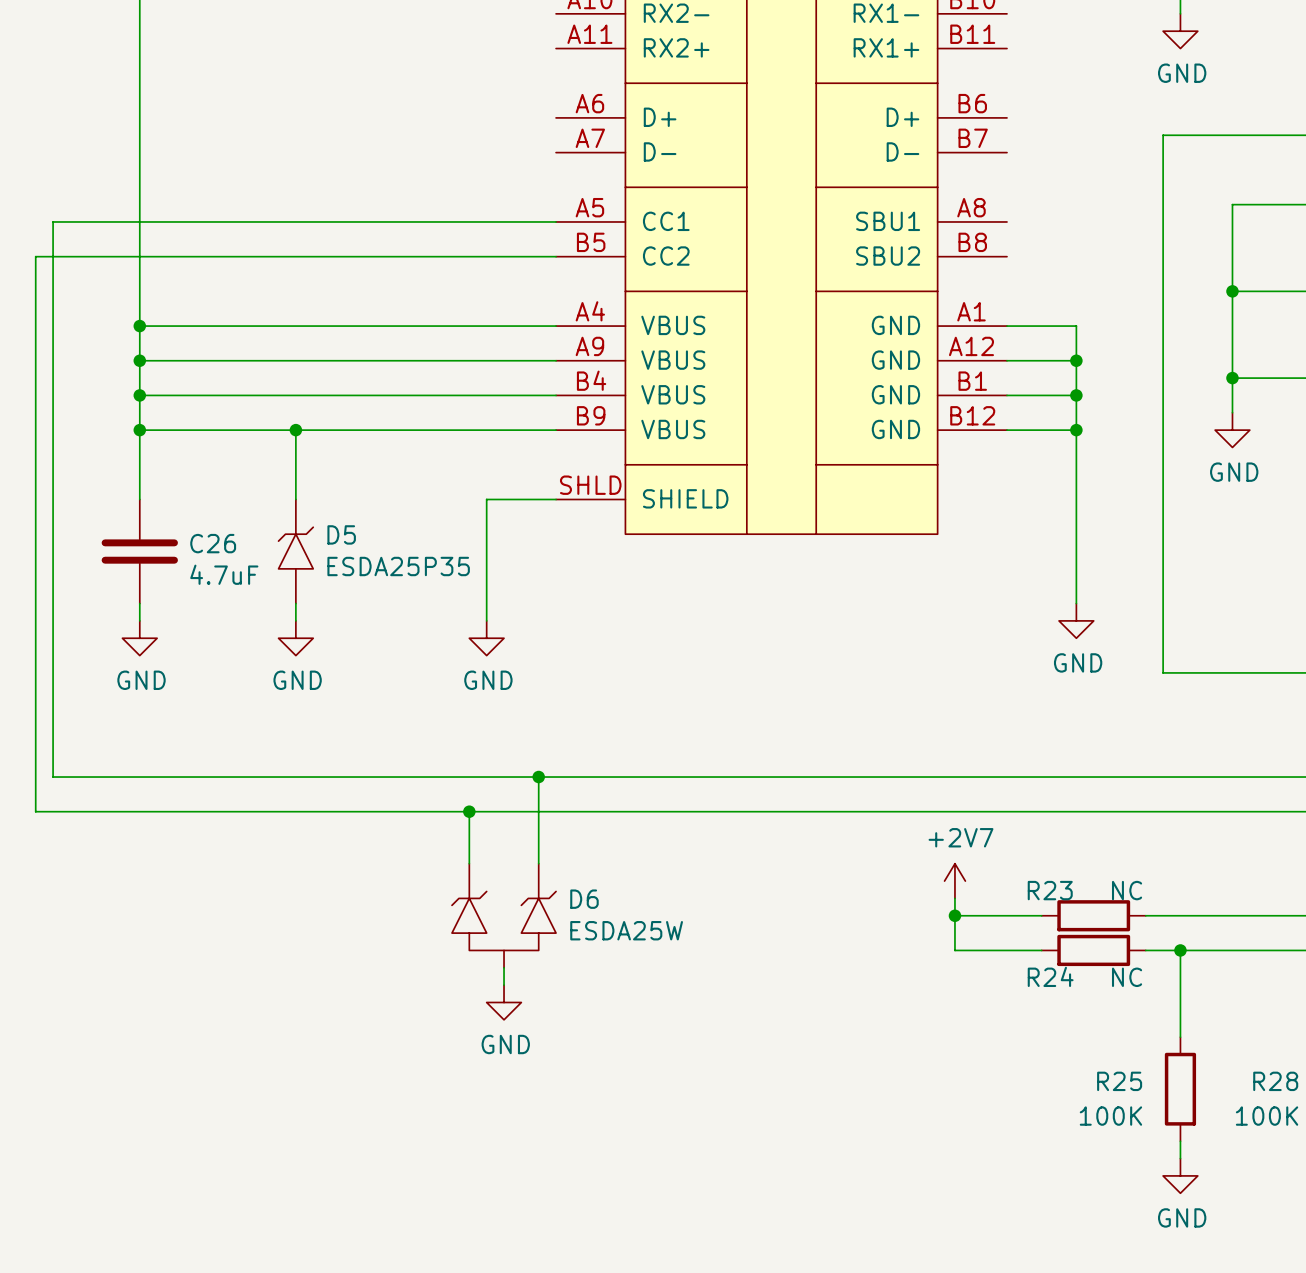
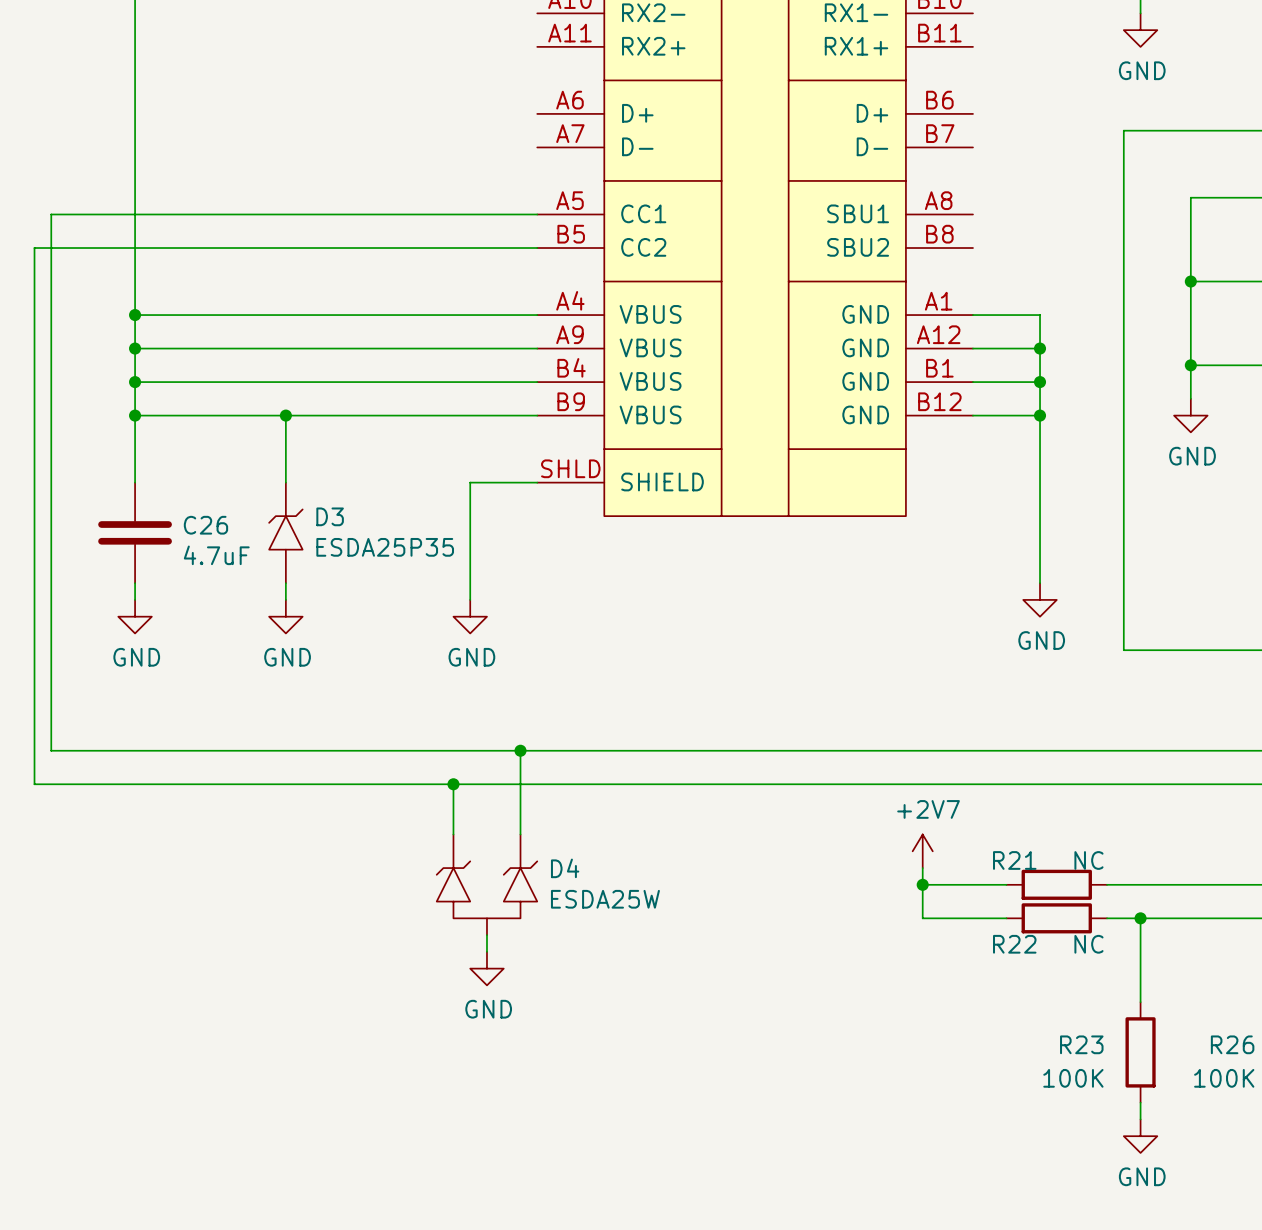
D5 name: D5 (341, 534) -> D3 (330, 516)
R23 name: R23 (1050, 890) -> R21 (1014, 860)
D6 name: D6 (584, 899) -> D4 (565, 868)
R24 name: R24 (1050, 976) -> R22 (1014, 944)
R25 name: R25 (1119, 1081) -> R23 (1081, 1044)
R28 name: R28 (1275, 1081) -> R26 (1232, 1044)

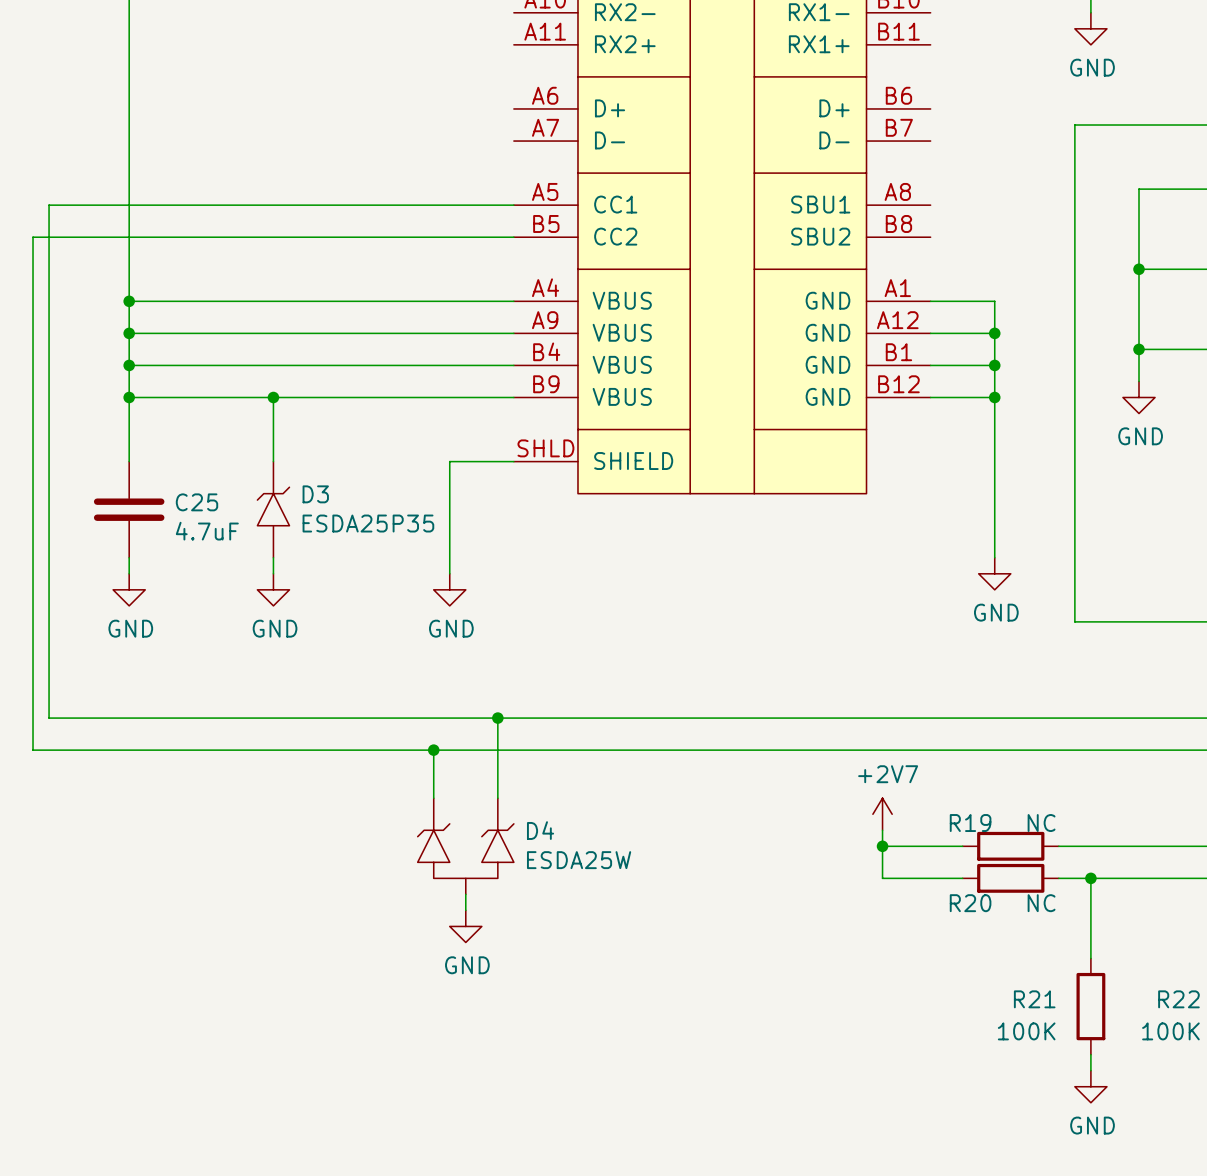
C26 name: C26 (205, 525) -> C25 (197, 502)
R21 name: R21 (1014, 860) -> R19 (970, 823)
R22 name: R22 (1014, 944) -> R20 (970, 903)
R23 name: R23 (1081, 1044) -> R21 (1034, 999)
R26 name: R26 (1232, 1044) -> R22 (1178, 999)

